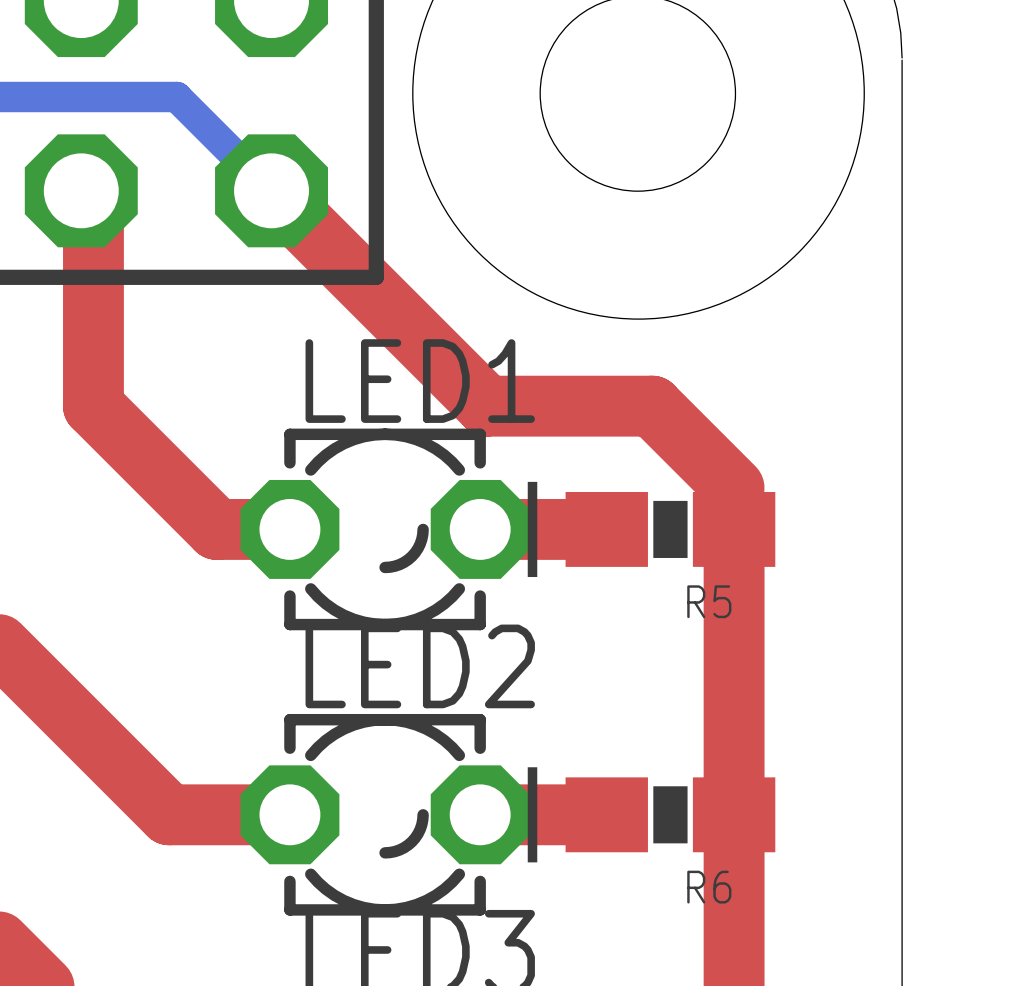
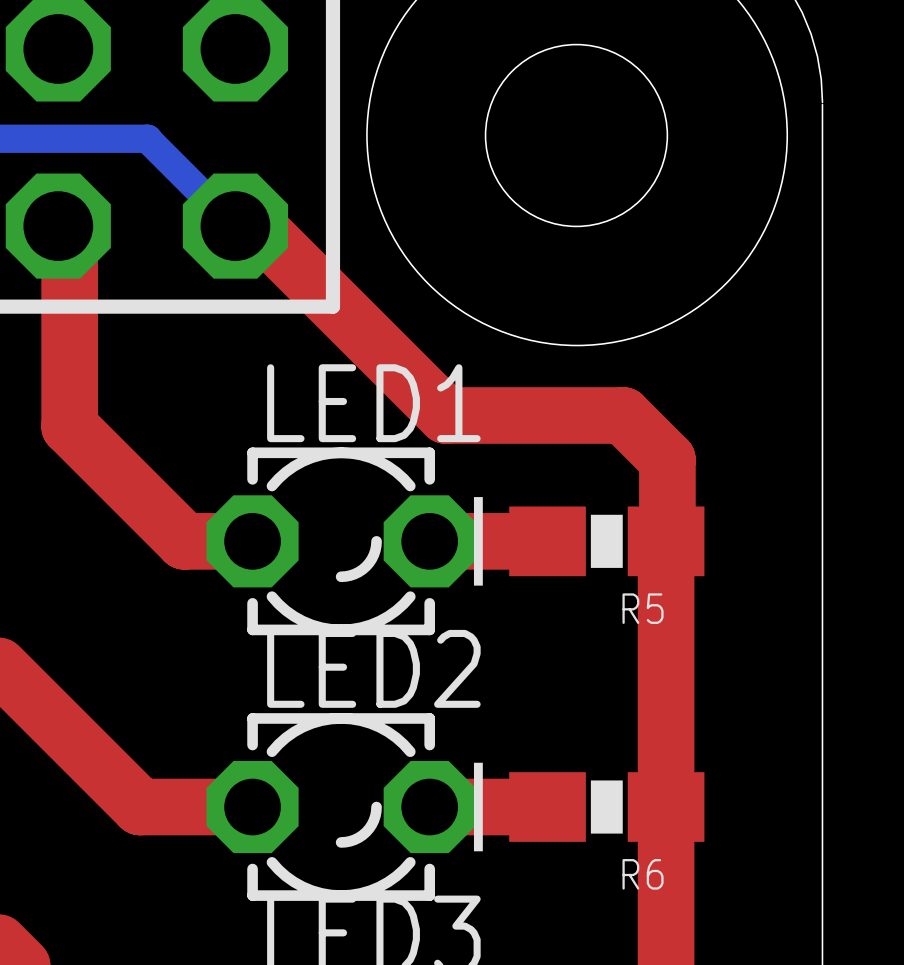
top track: (271, 190) (486, 406) (652, 406) (734, 487) (734, 529) -> (235, 226) (256, 226) (446, 415) (623, 415) (667, 459) (666, 541)

